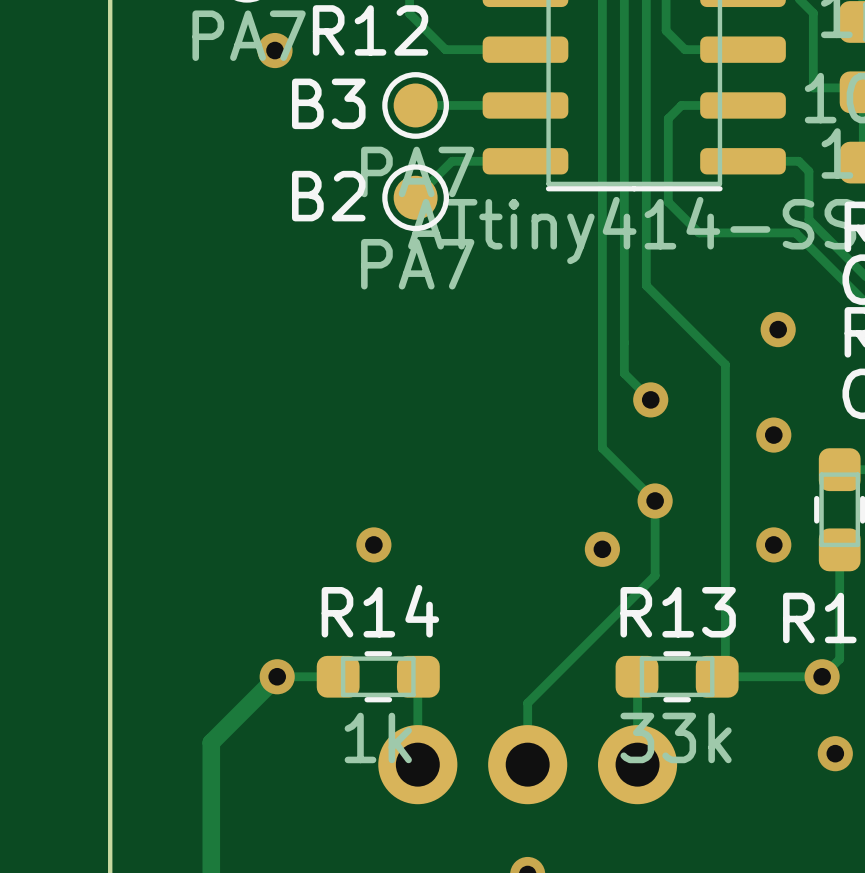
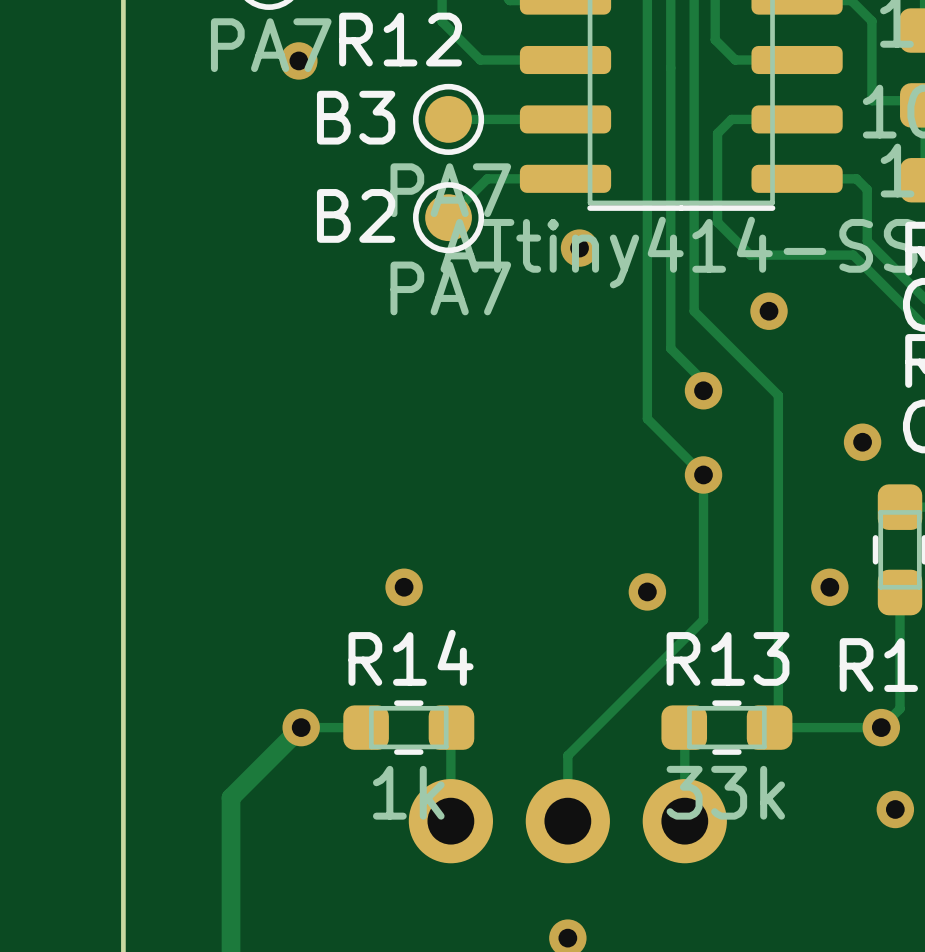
via: none -> (579, 248)
via: none -> (769, 311)
track: (624, 320) (624, 373) (650, 399) -> (670, 348) (703, 381) (703, 390)
via: (778, 329) -> none
via: none -> (703, 390)
track: (602, 386) (602, 448) (655, 500) -> (647, 418) (703, 474) (703, 540)
via: (650, 399) -> none
via position: (773, 435) -> (862, 442)
via: none -> (703, 474)
via: (655, 500) -> none

